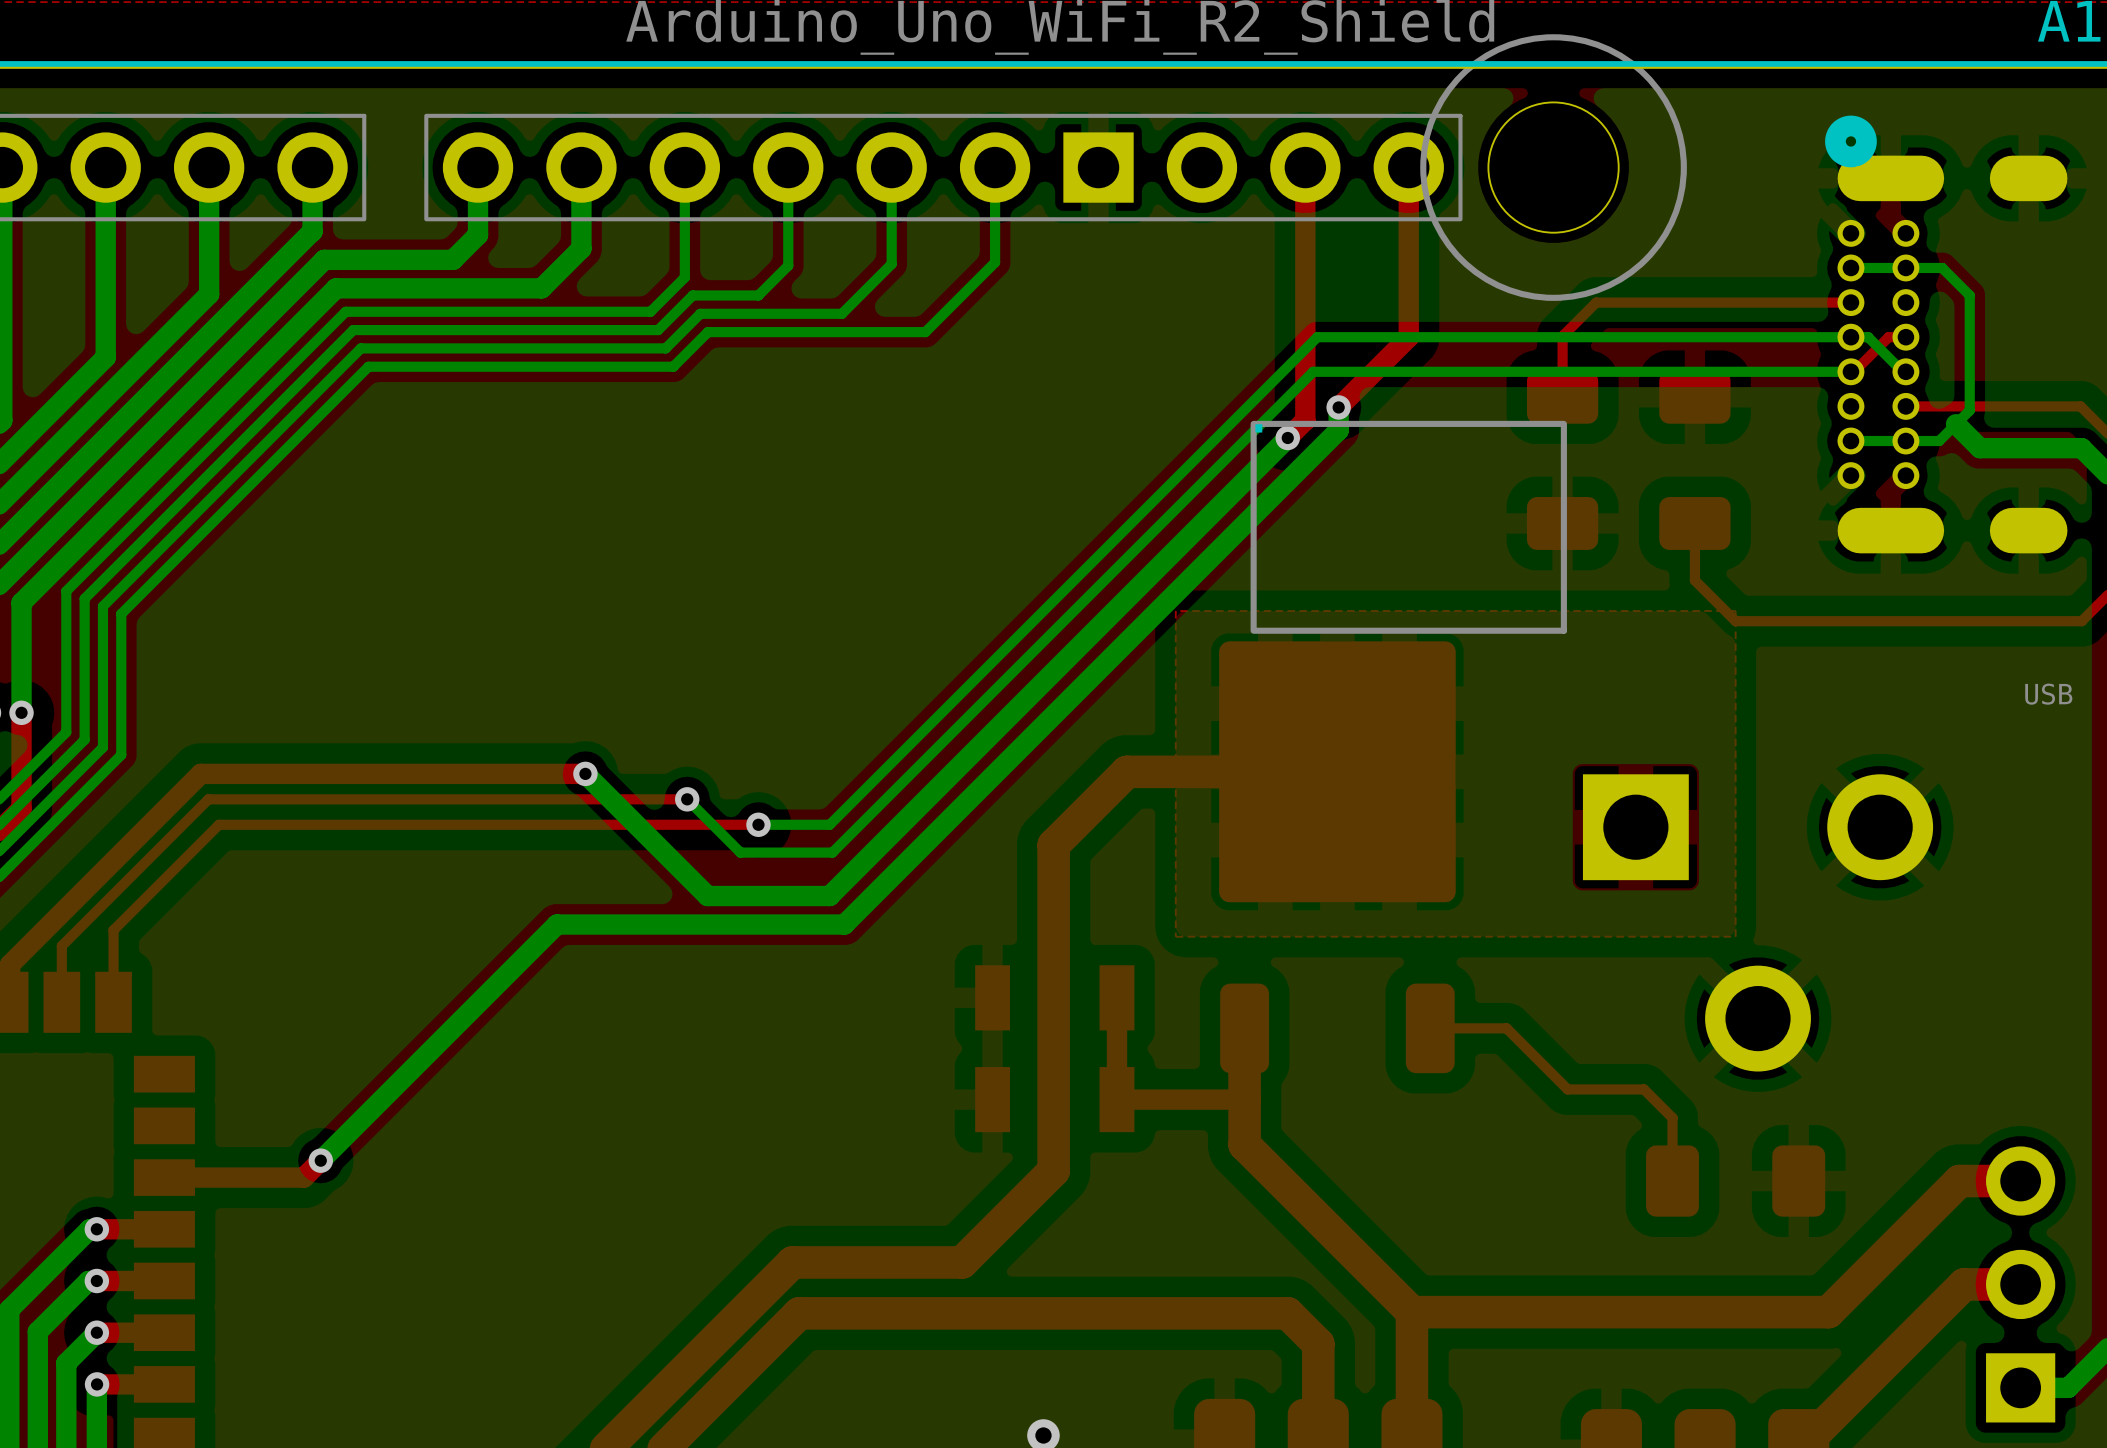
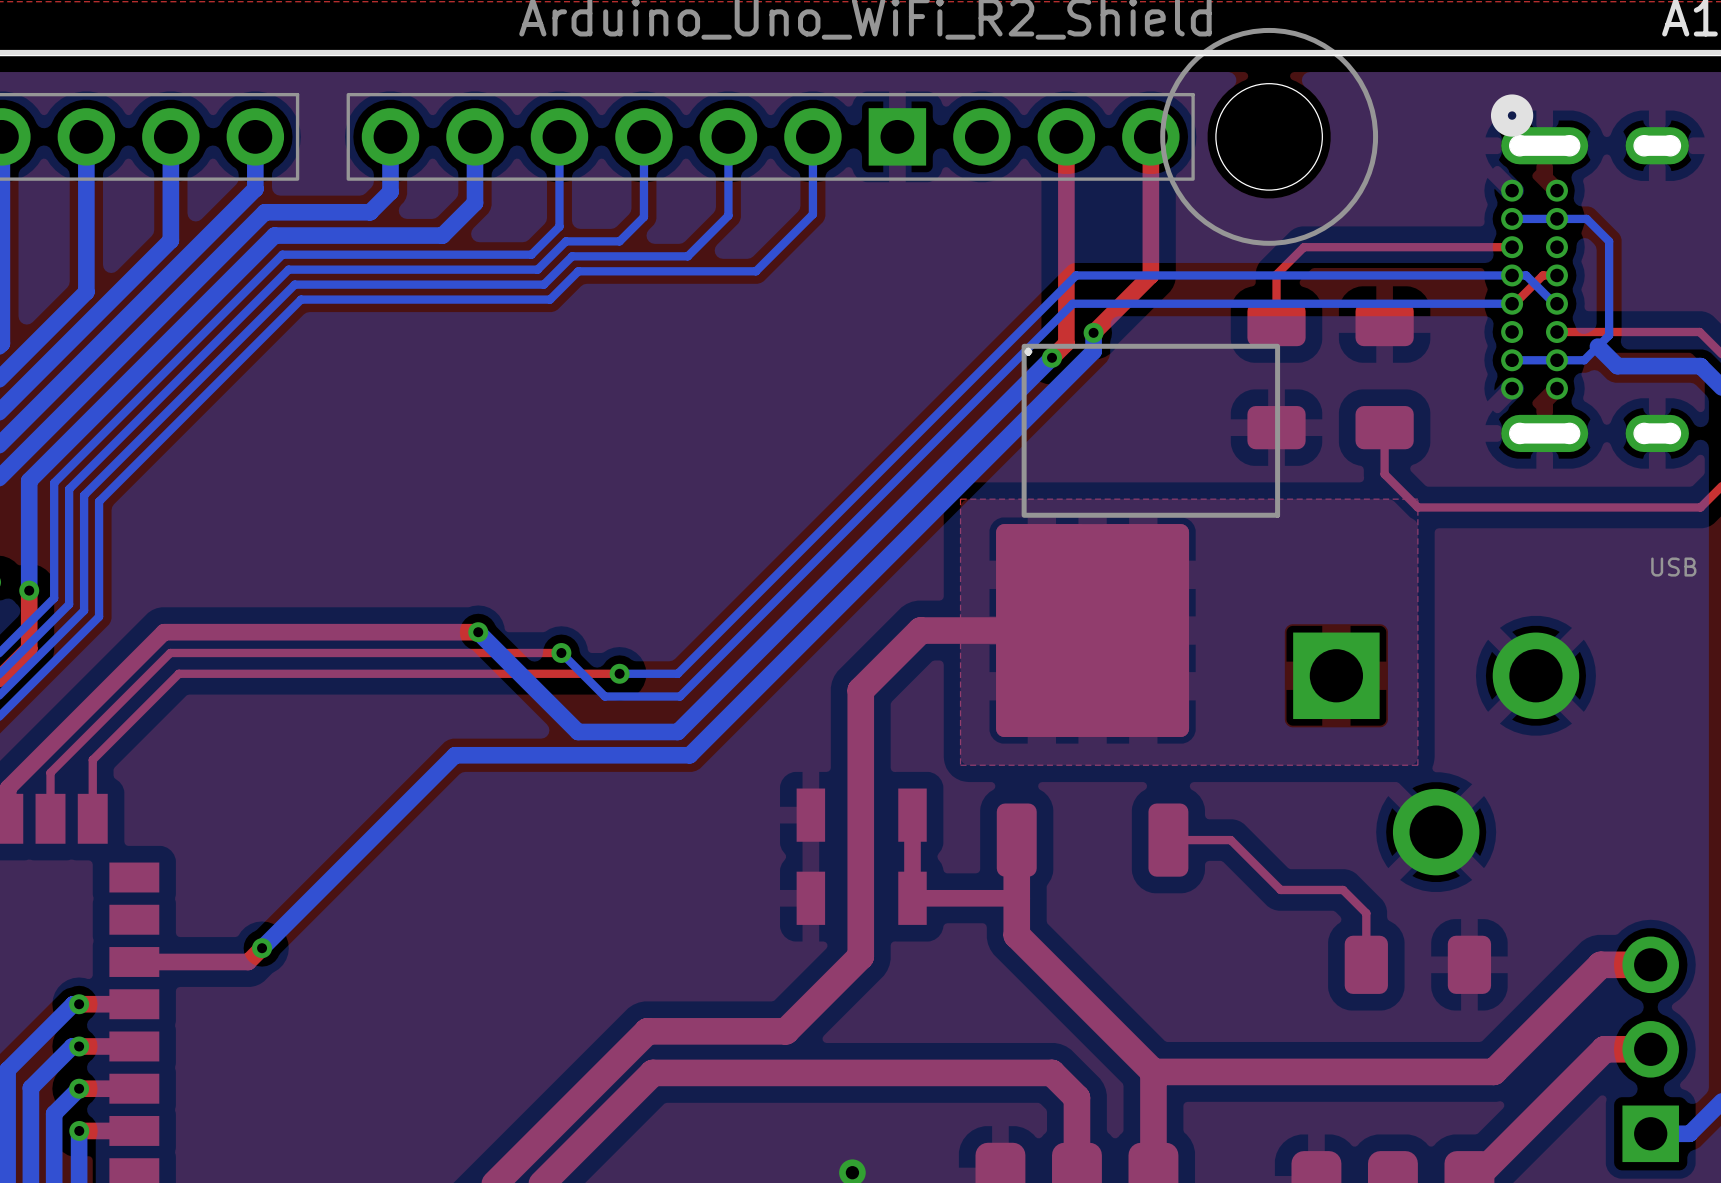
bottom track: (35, 588) (21, 602) (21, 712) -> (29, 480) (29, 590)
top track: (21, 712) (21, 808) -> (29, 590) (29, 648) (17, 660)
via position: (21, 712) -> (29, 590)

